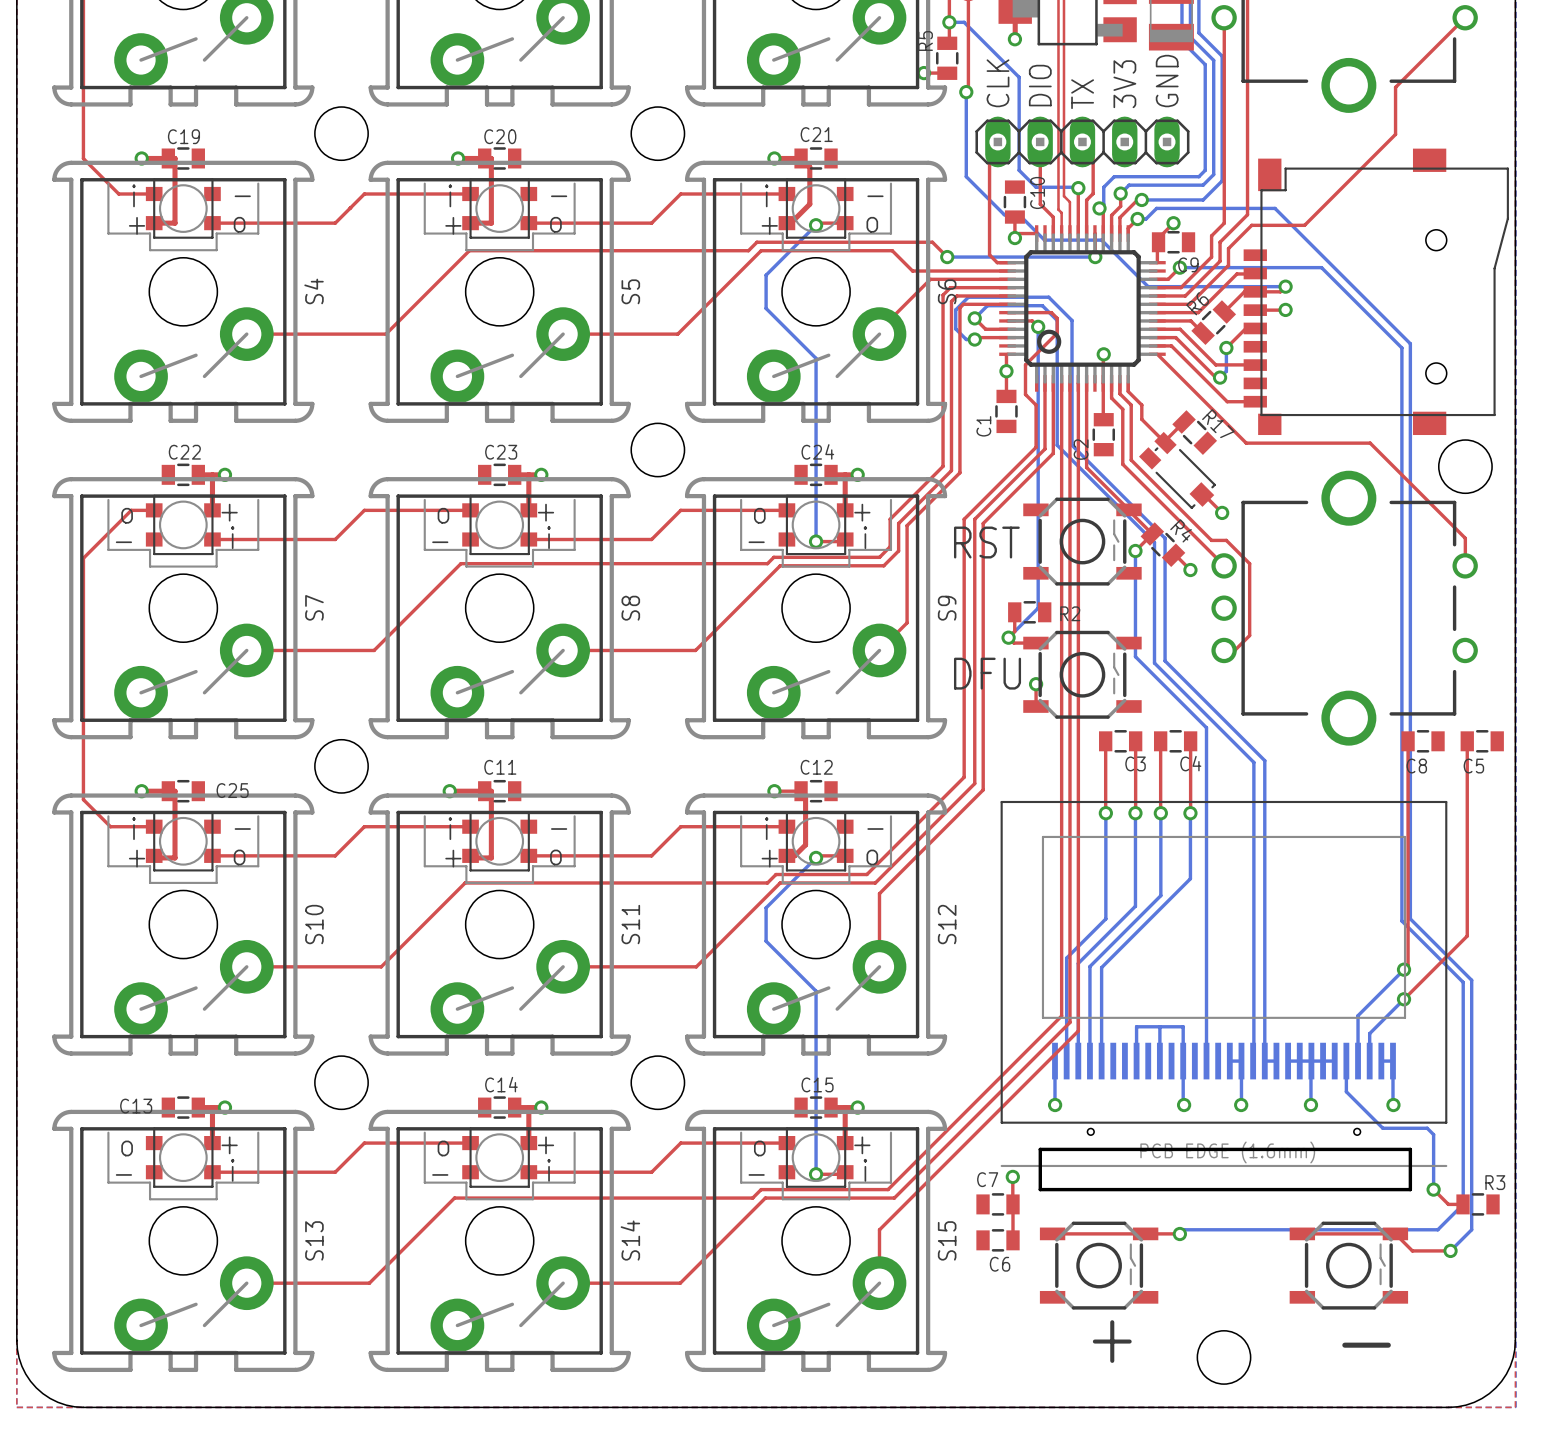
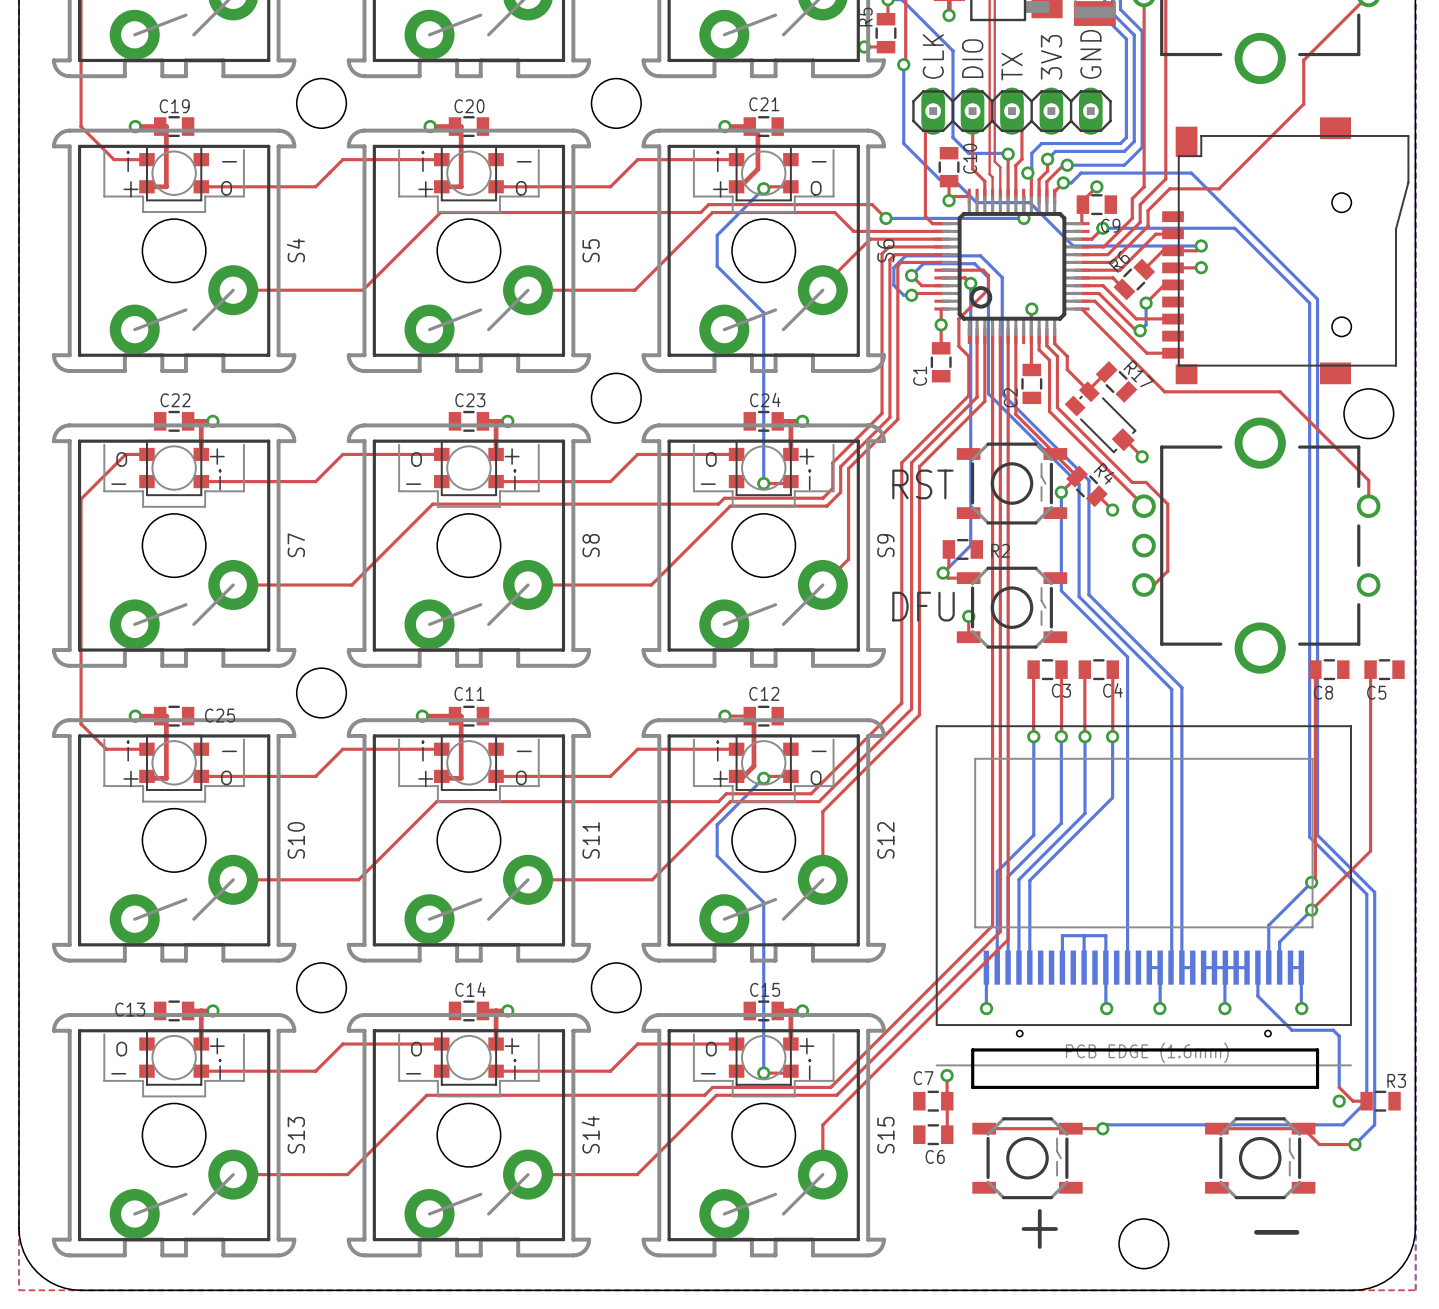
via position: (1433, 1189) -> (1339, 1101)

